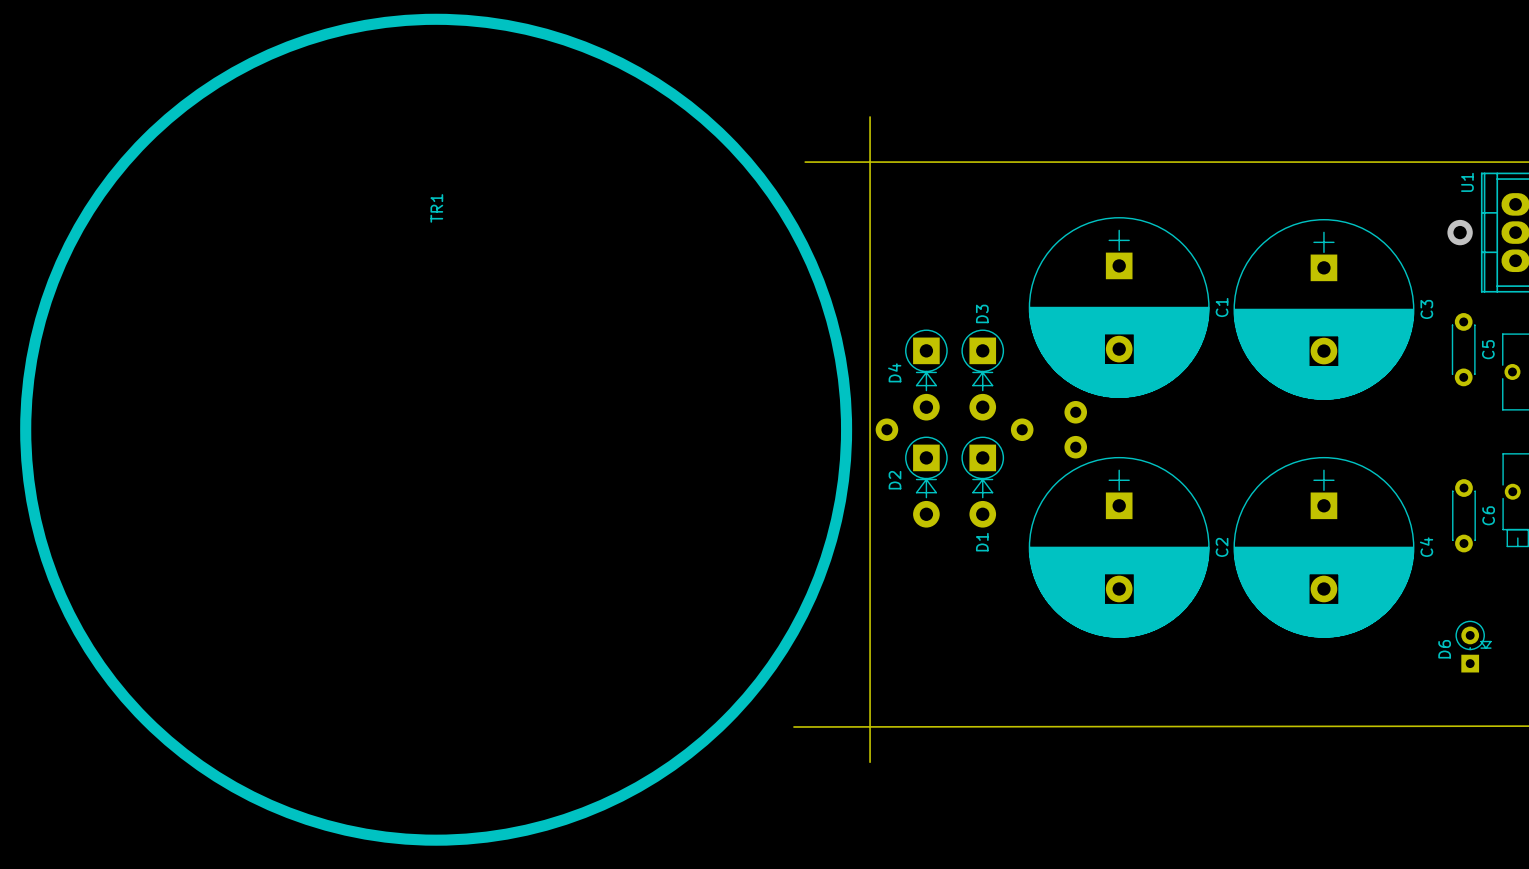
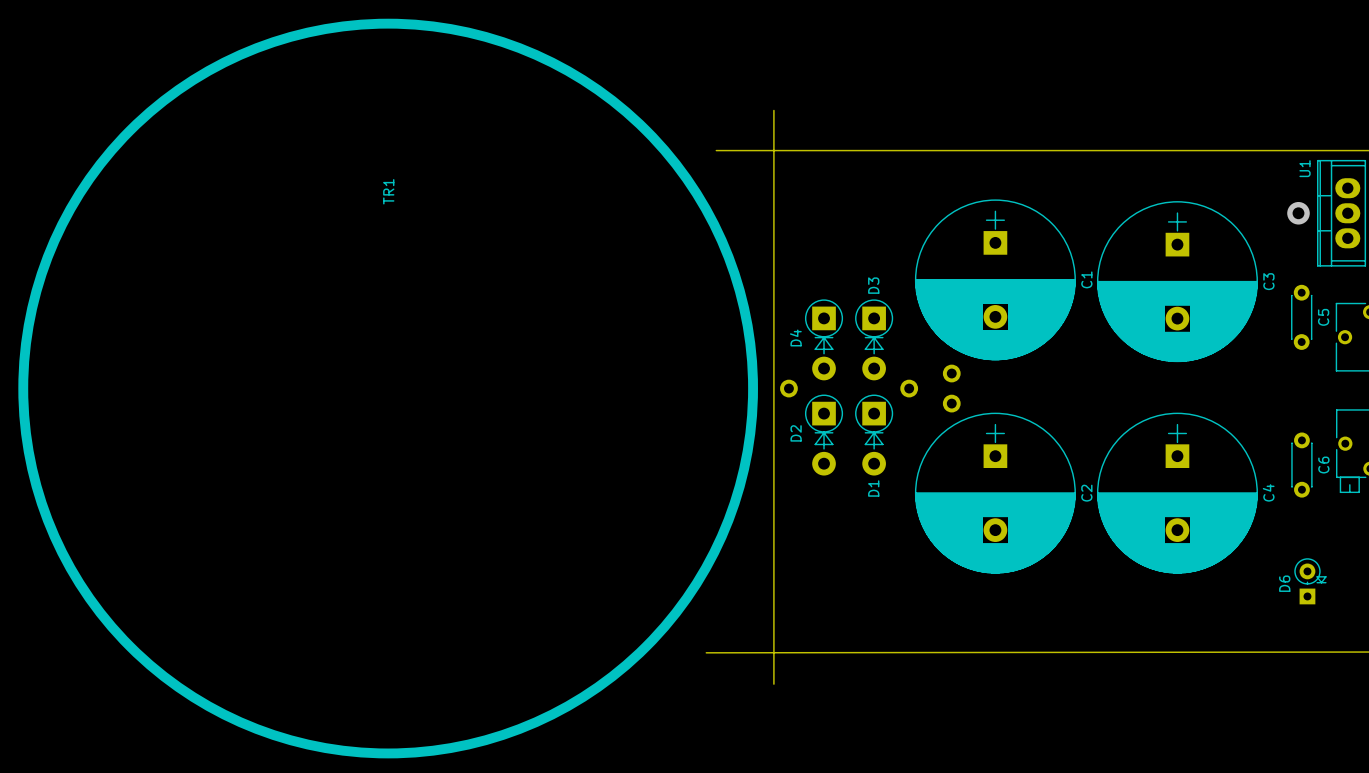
TR1 footprint: [20, 13, 1088, 846] -> [18, 18, 961, 759]

